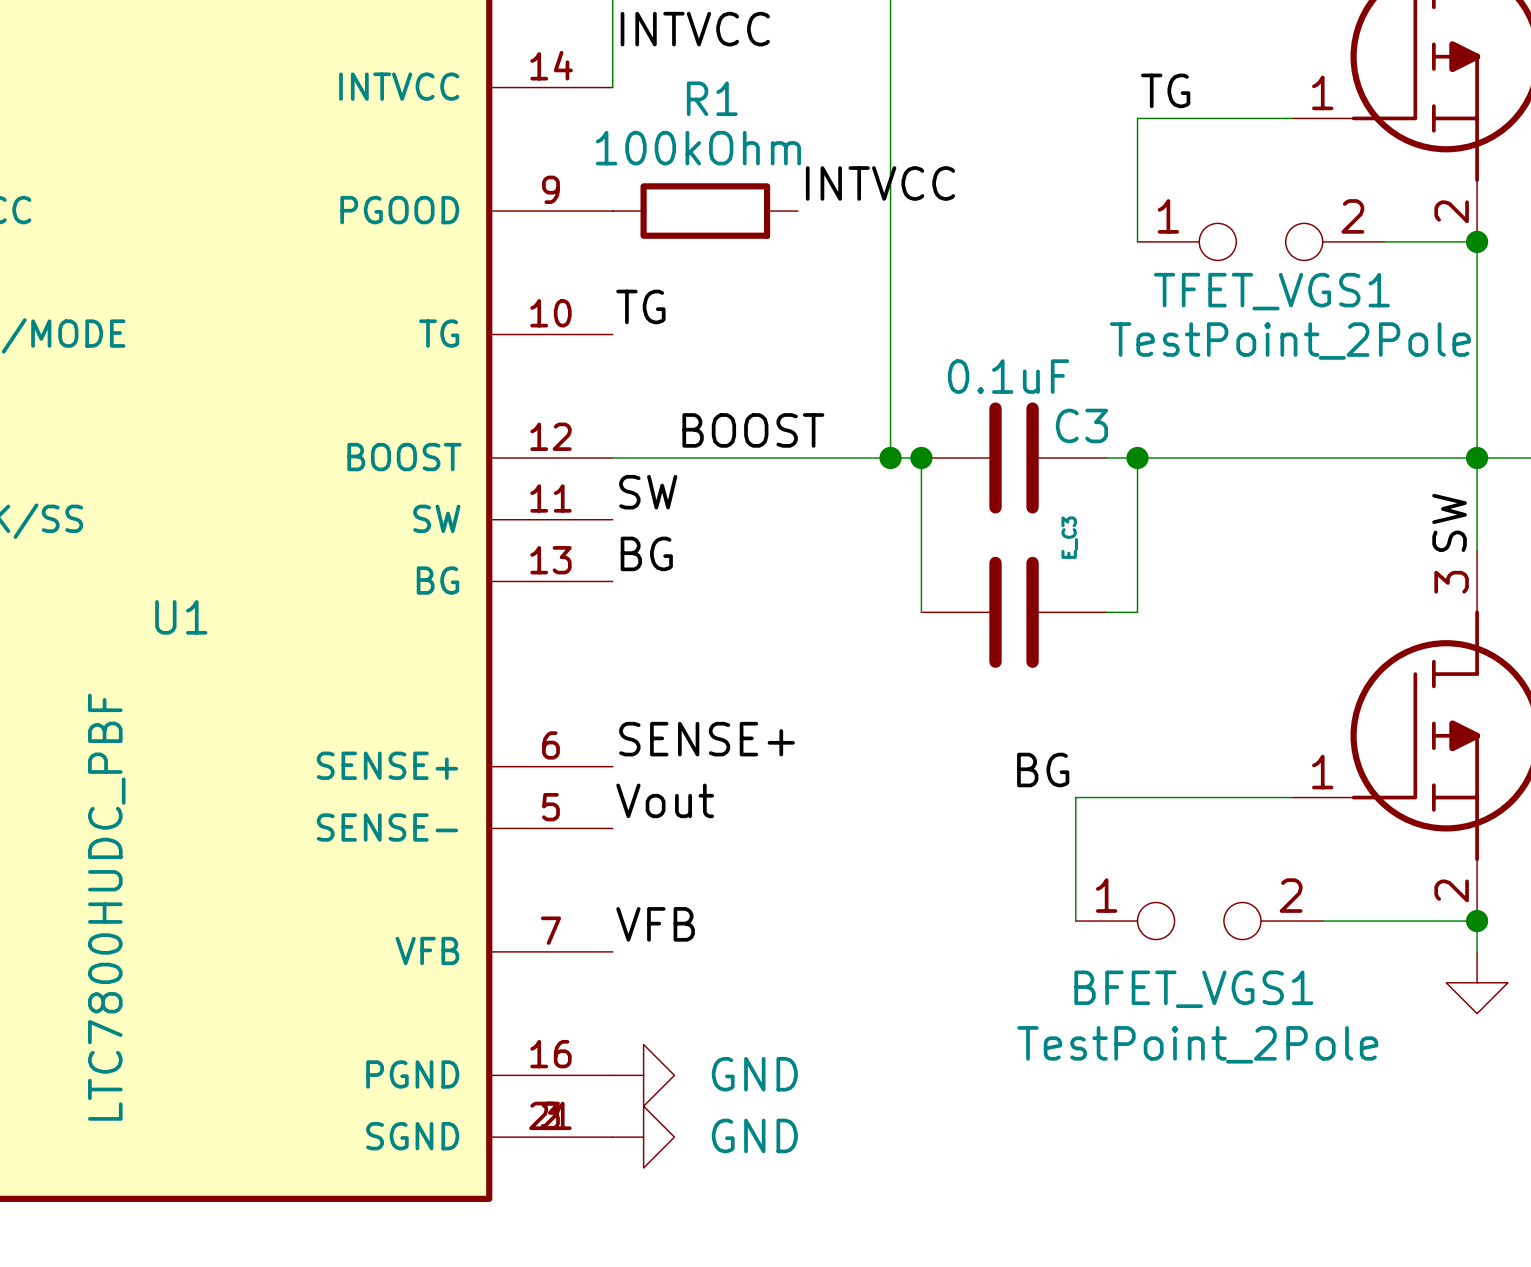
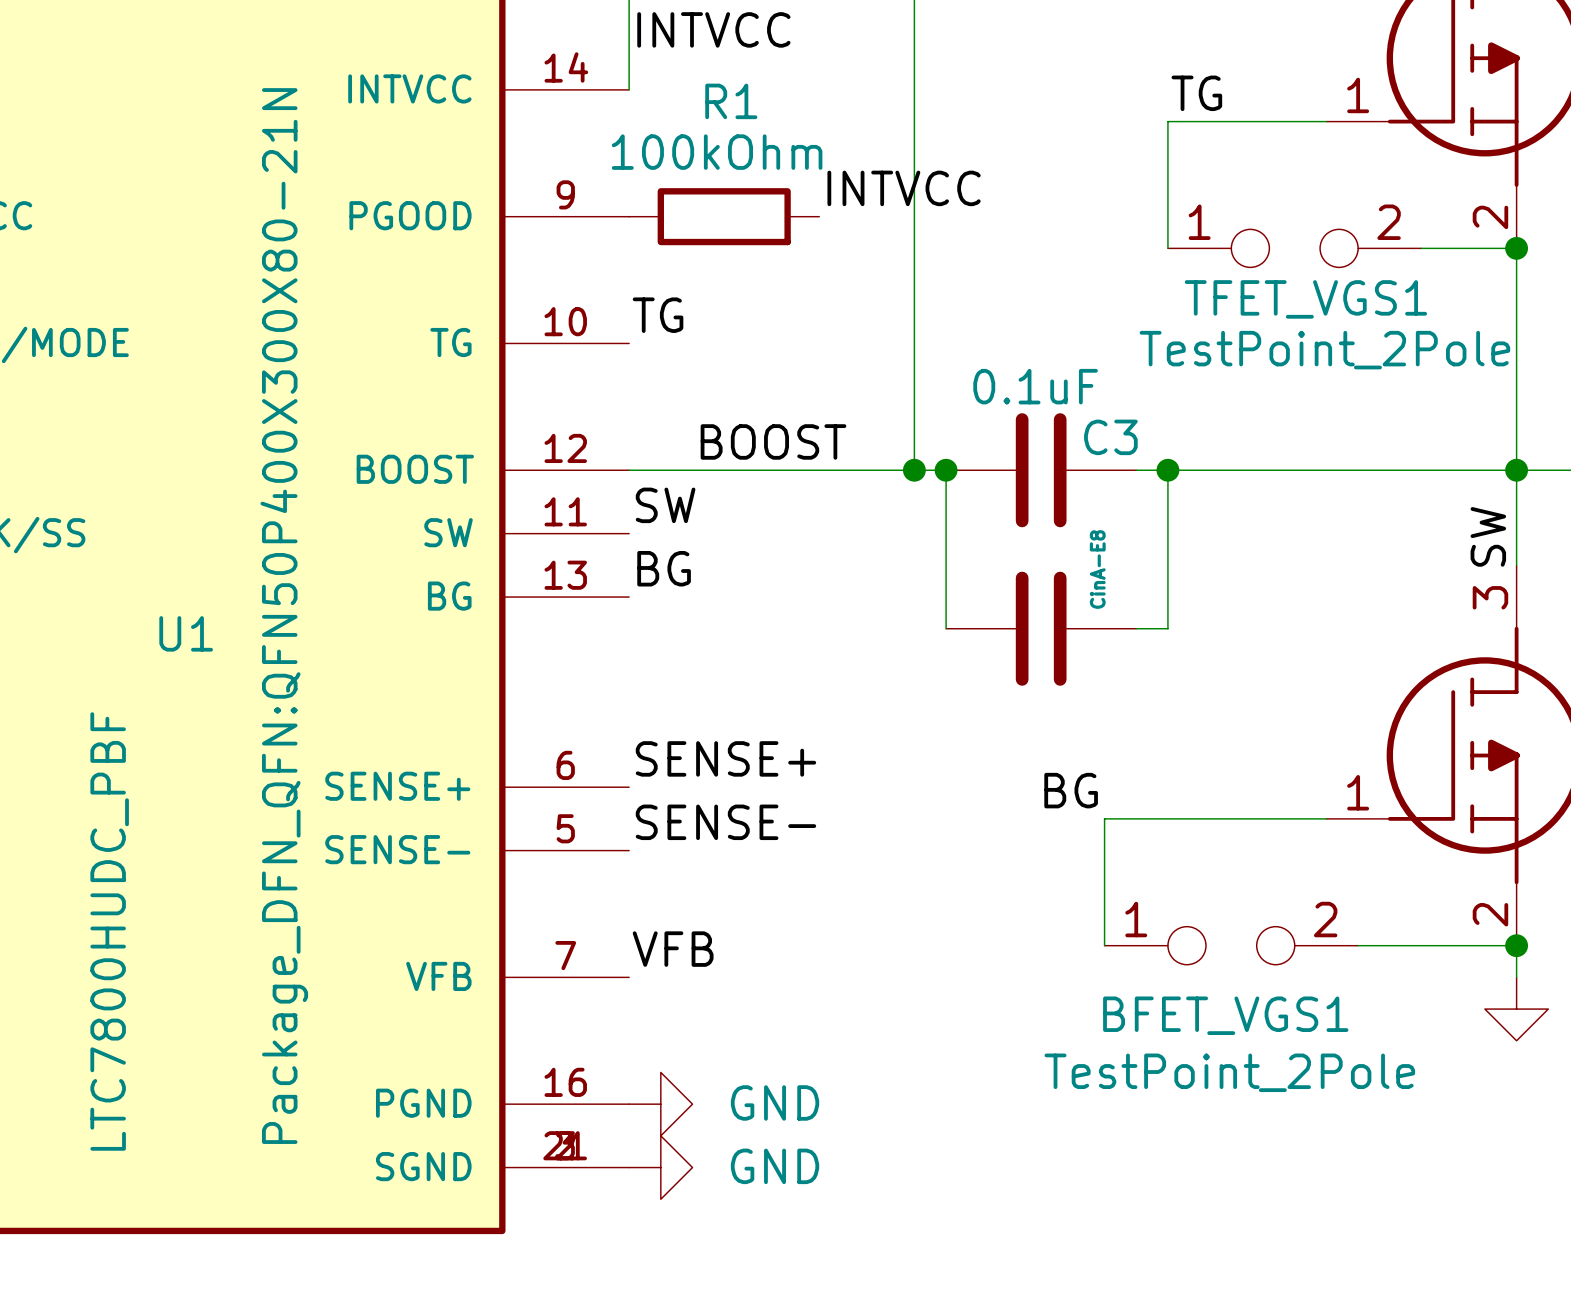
E_C3 name: E_C3 (1069, 537) -> CinA-E8 (1097, 569)
U1 text: none -> Package_DFN_QFN:QFN50P400X300X80-21N (284, 616)
label: Vout (665, 800) -> SENSE- (725, 822)

